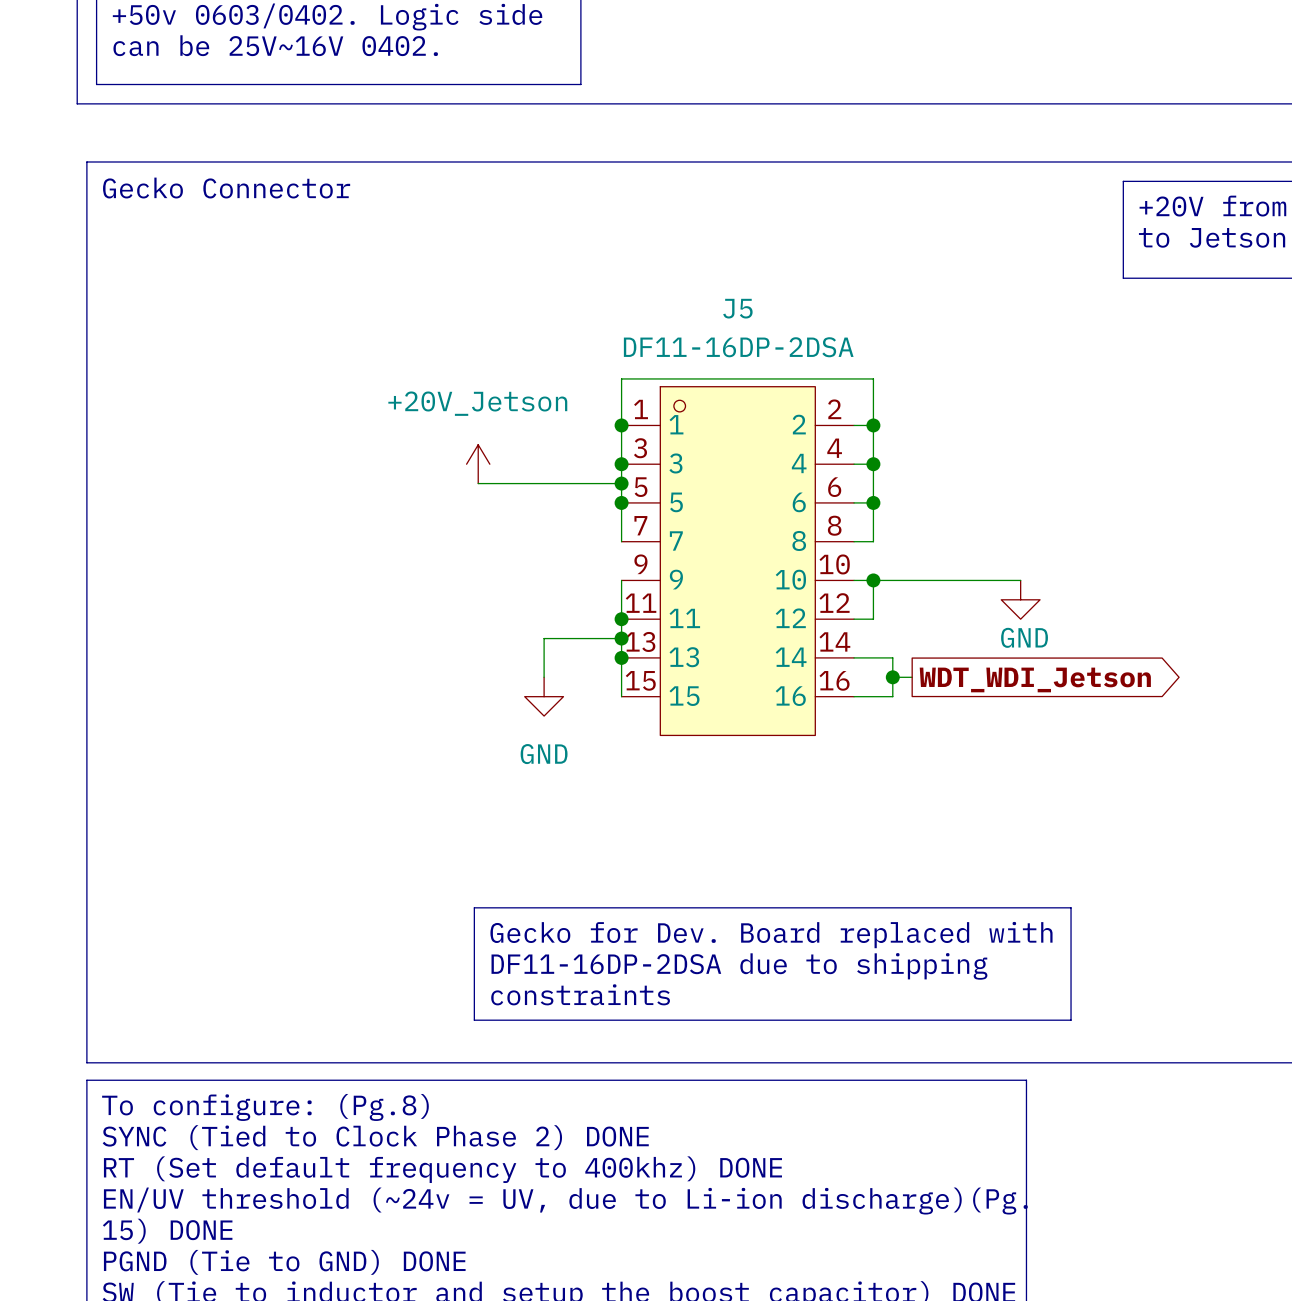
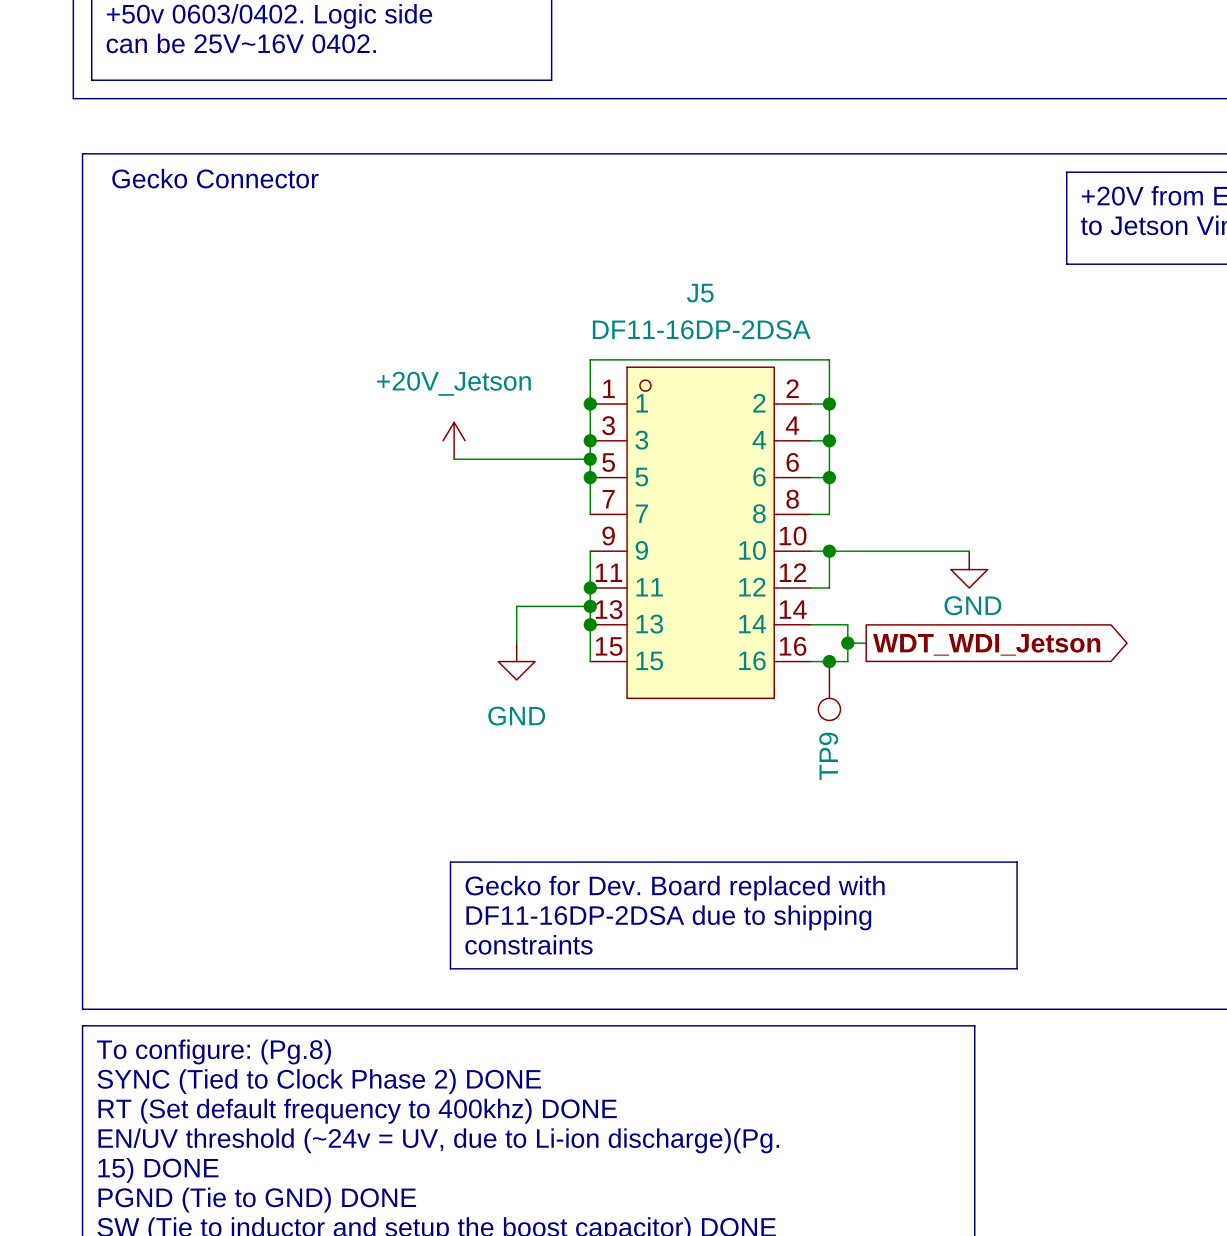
junction: none -> (829, 661)
TP9: none -> (829, 691)

